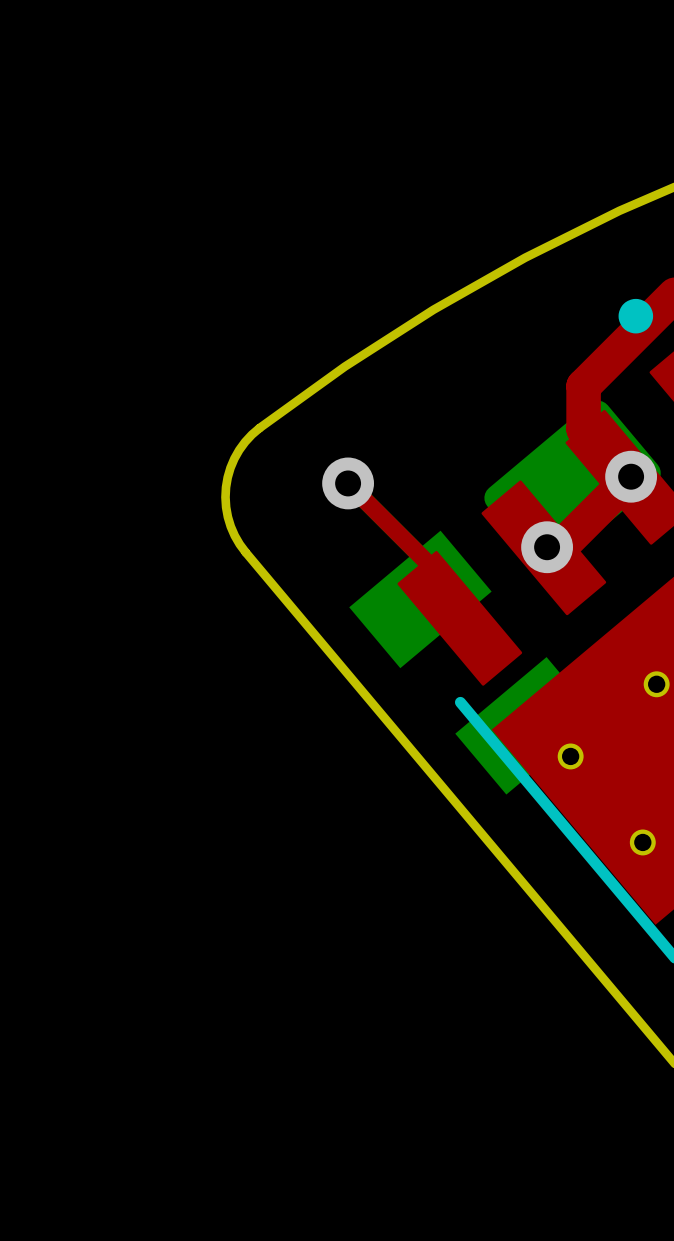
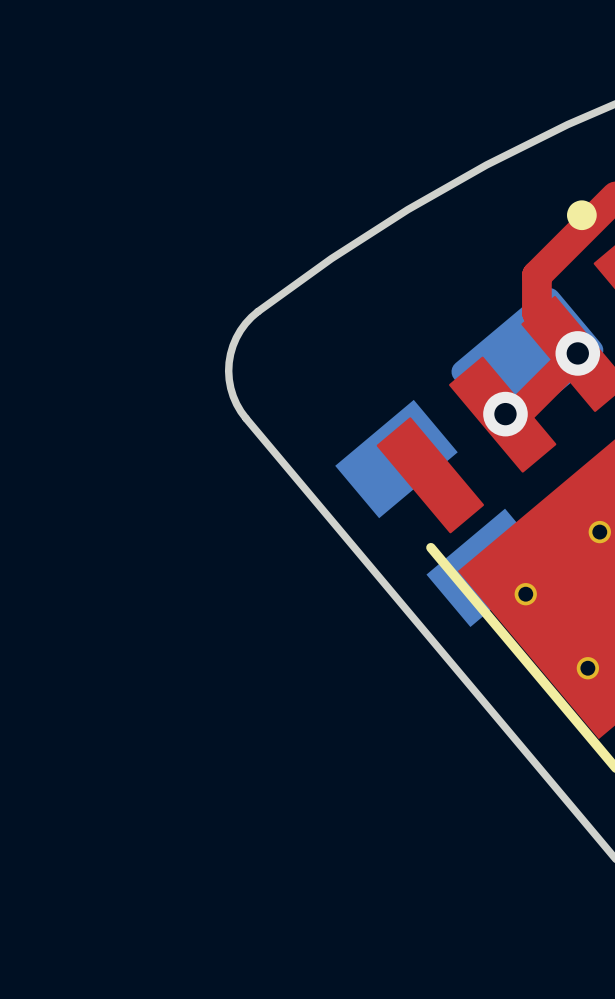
top track: (348, 483) (459, 595) (459, 618) -> none
via: (348, 483) -> none

